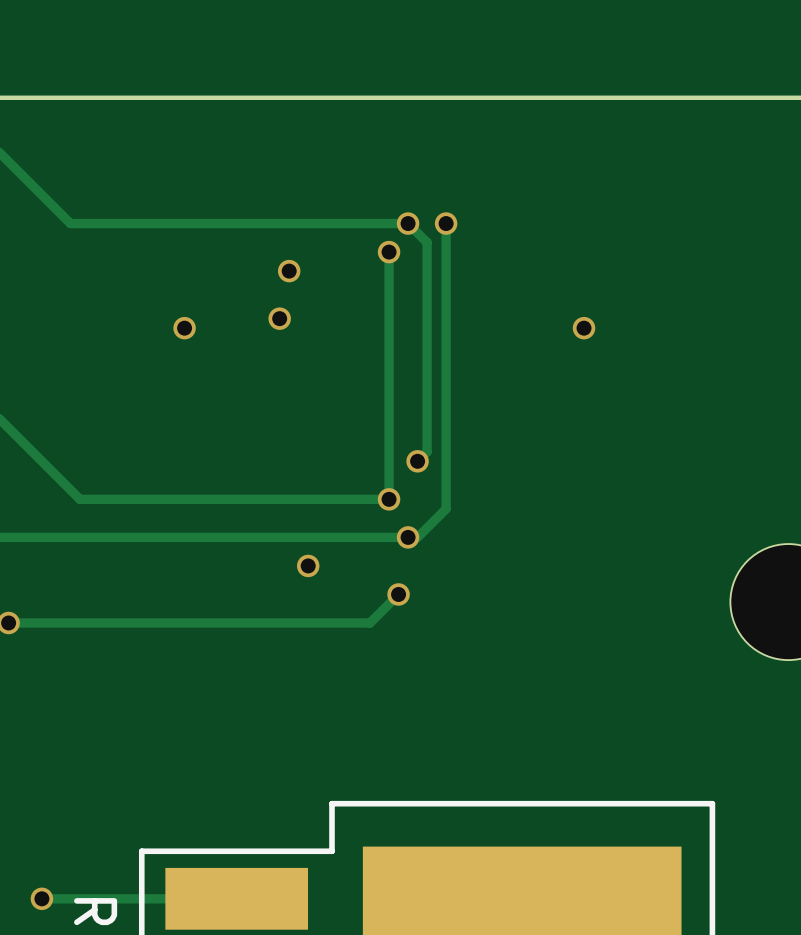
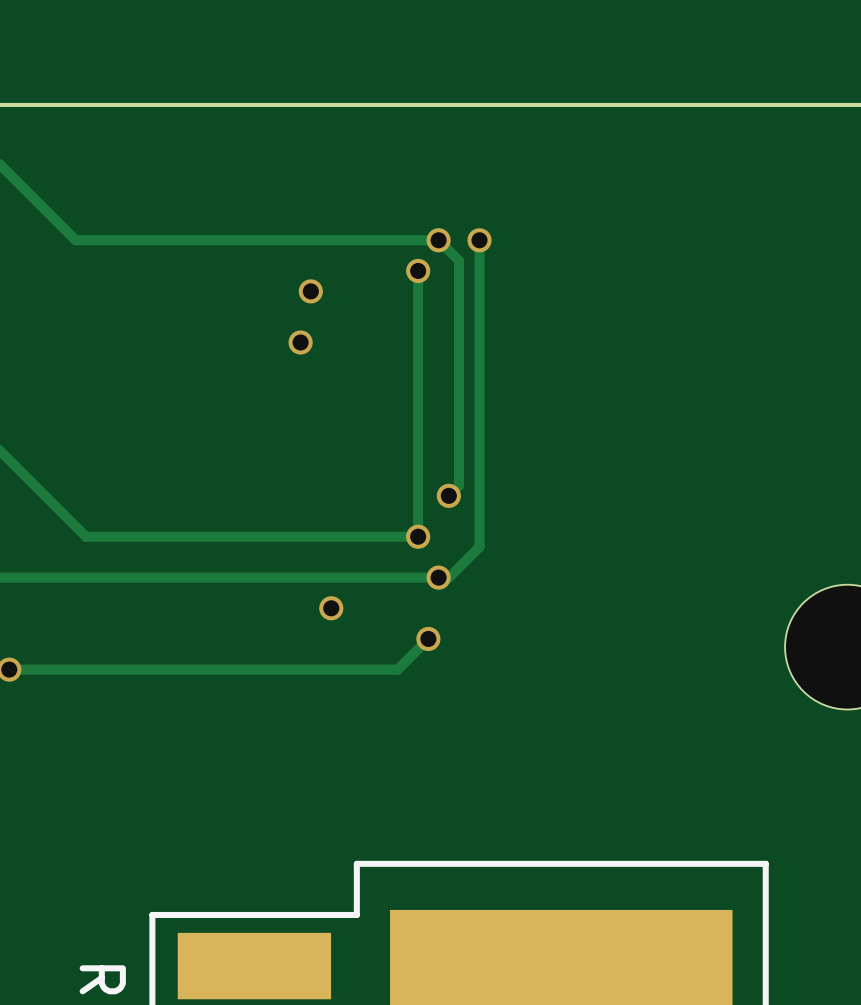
via: (184, 328) -> none
via: (584, 328) -> none
via: (41, 898) -> none
track: (236, 898) (41, 898) -> none

